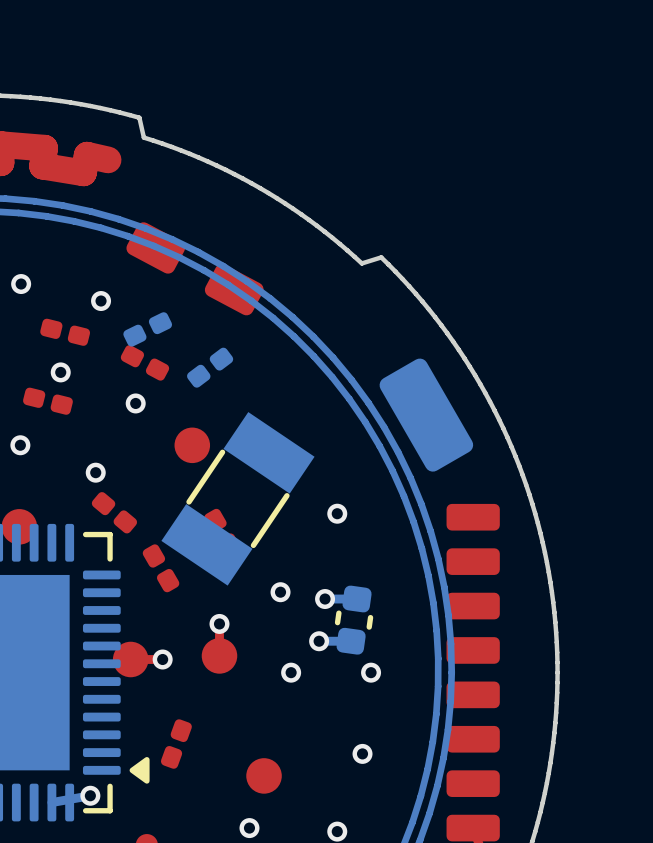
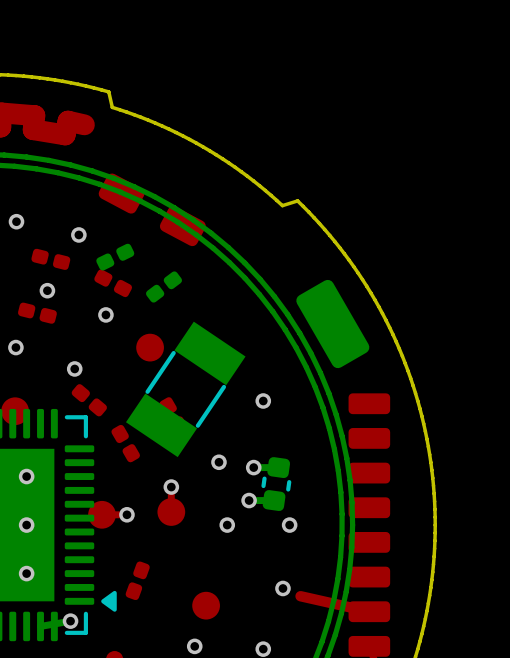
via: none -> (26, 476)
via: none -> (26, 525)
via: none -> (26, 573)
top track: none -> (300, 596) (369, 611)

